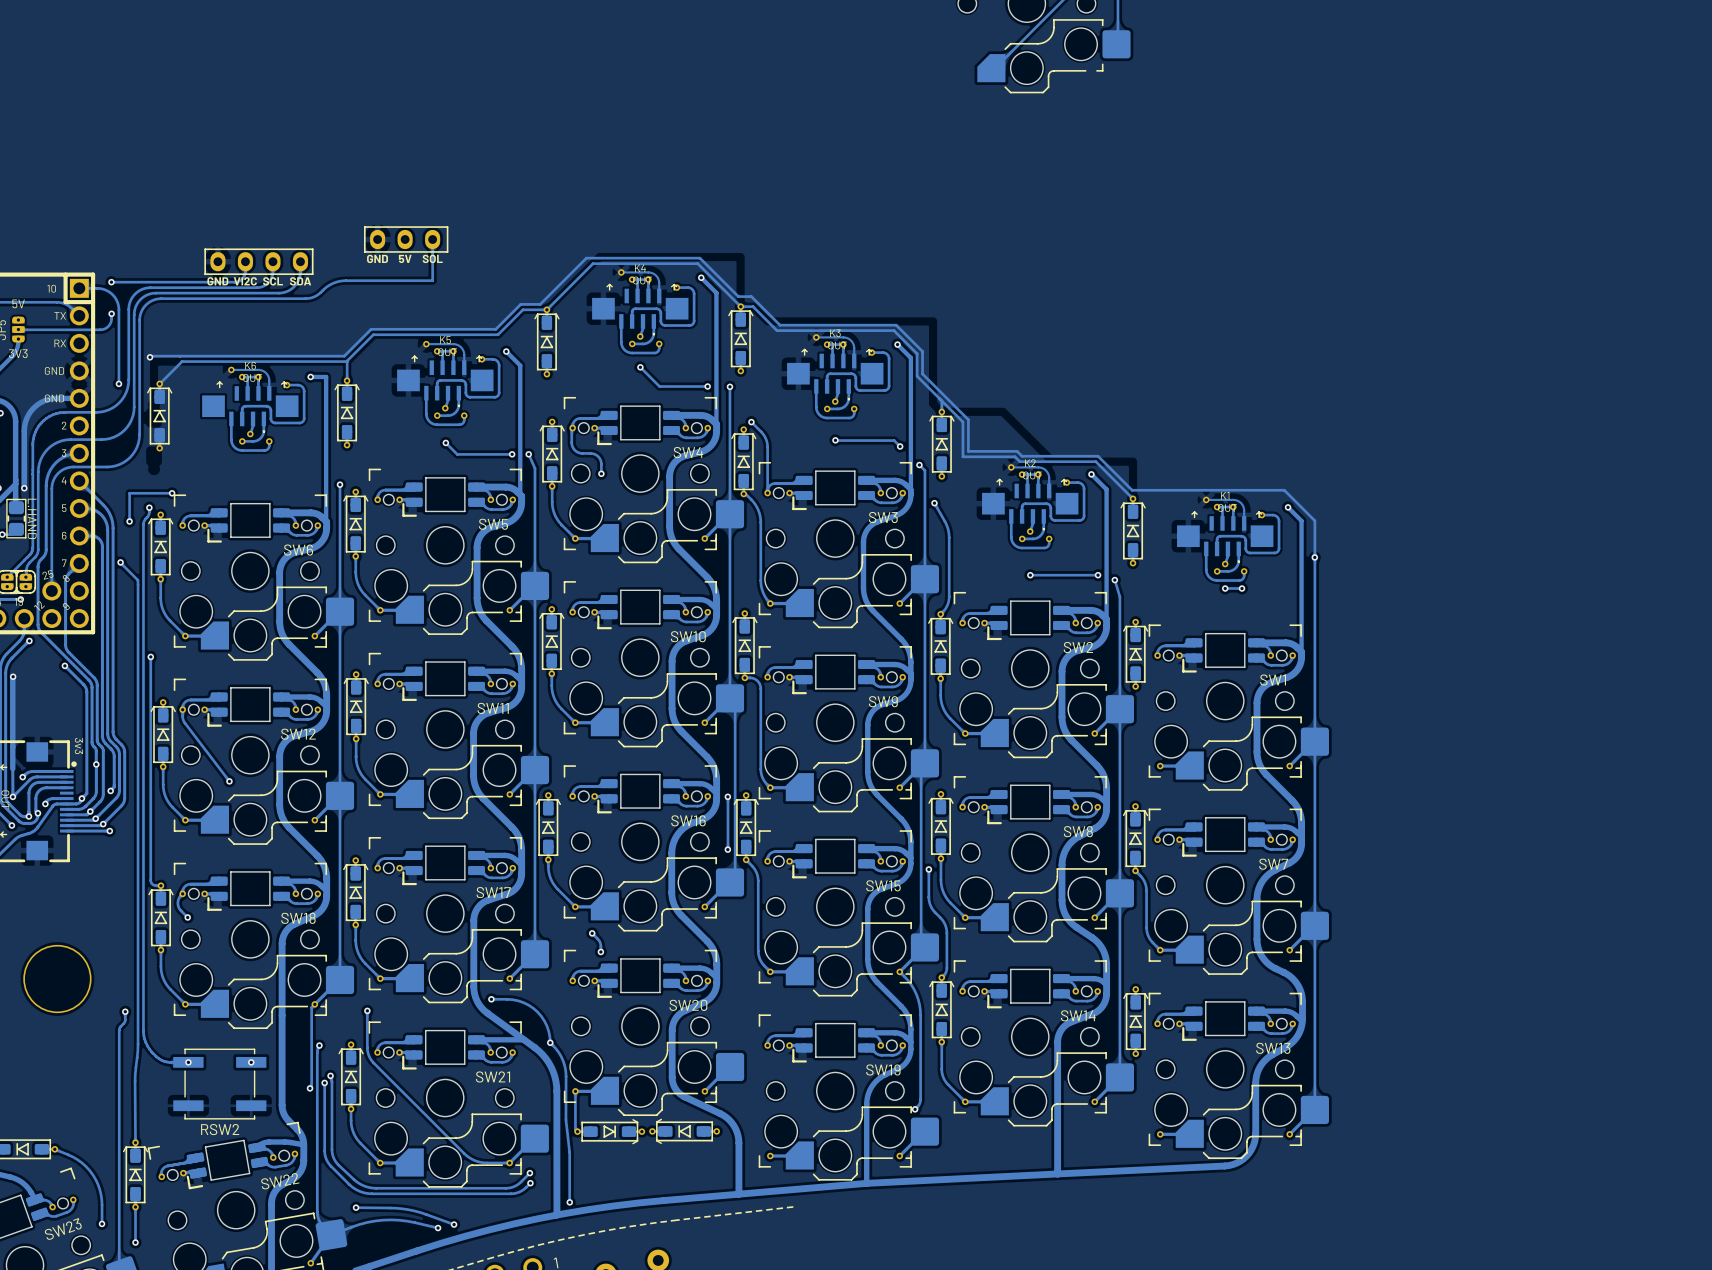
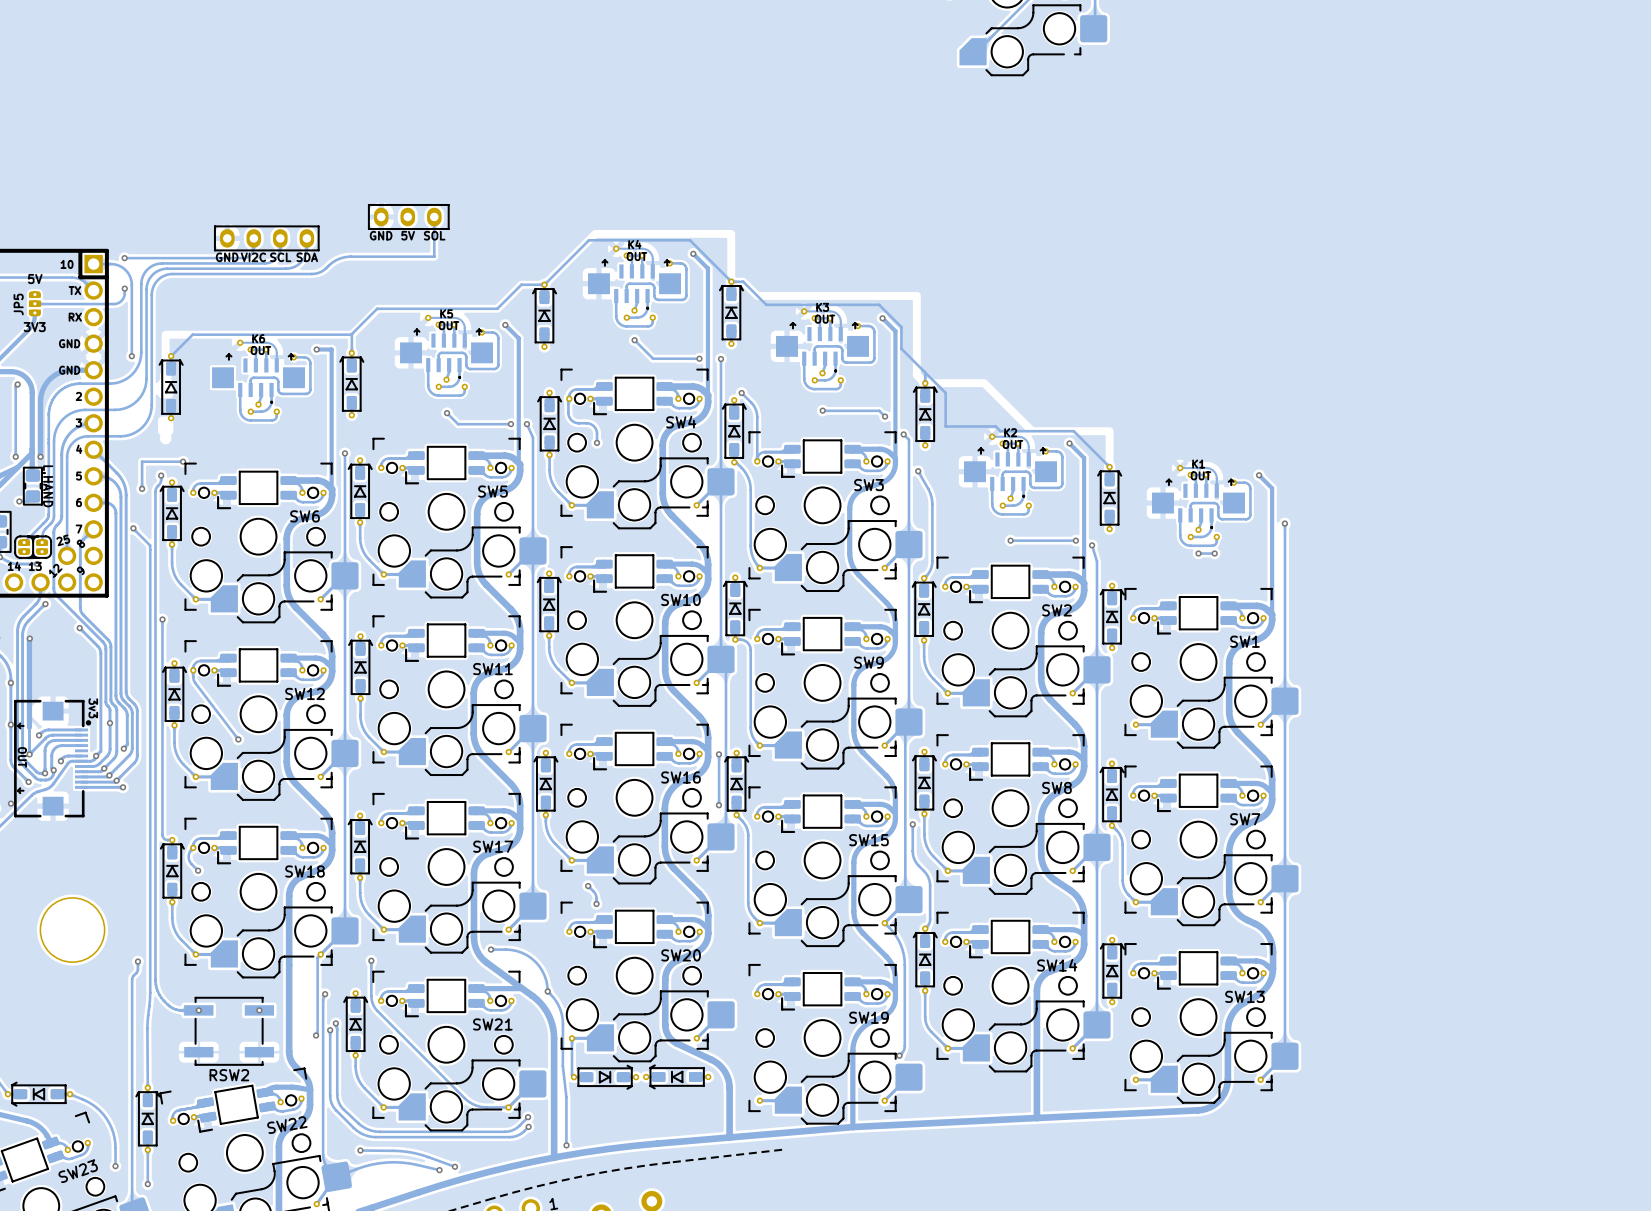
track: (150, 357) (344, 356) (371, 329) (495, 329) (520, 304) (540, 304) (586, 258) (699, 258) (738, 296) (751, 296) (780, 325) (896, 325) (922, 351) (922, 373) (968, 419) (968, 451) (1017, 451) (1022, 456) (1098, 456) (1132, 490) (1284, 490) (1314, 520) (1314, 557) -> none
via: (150, 357) -> none

